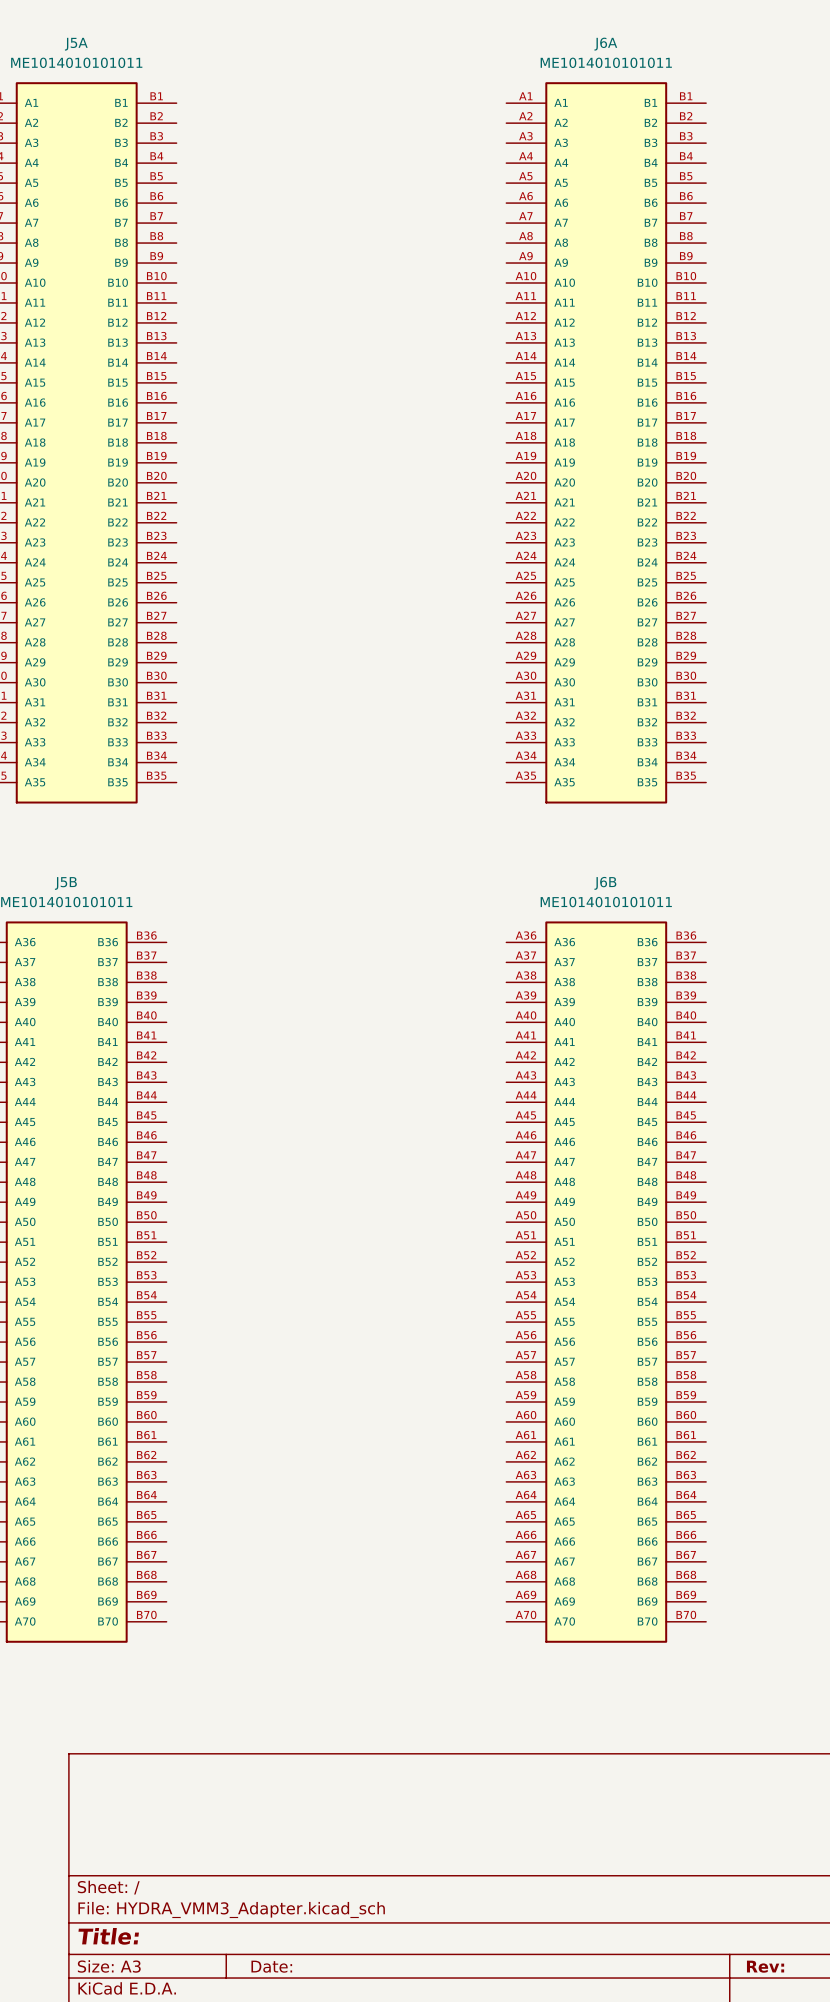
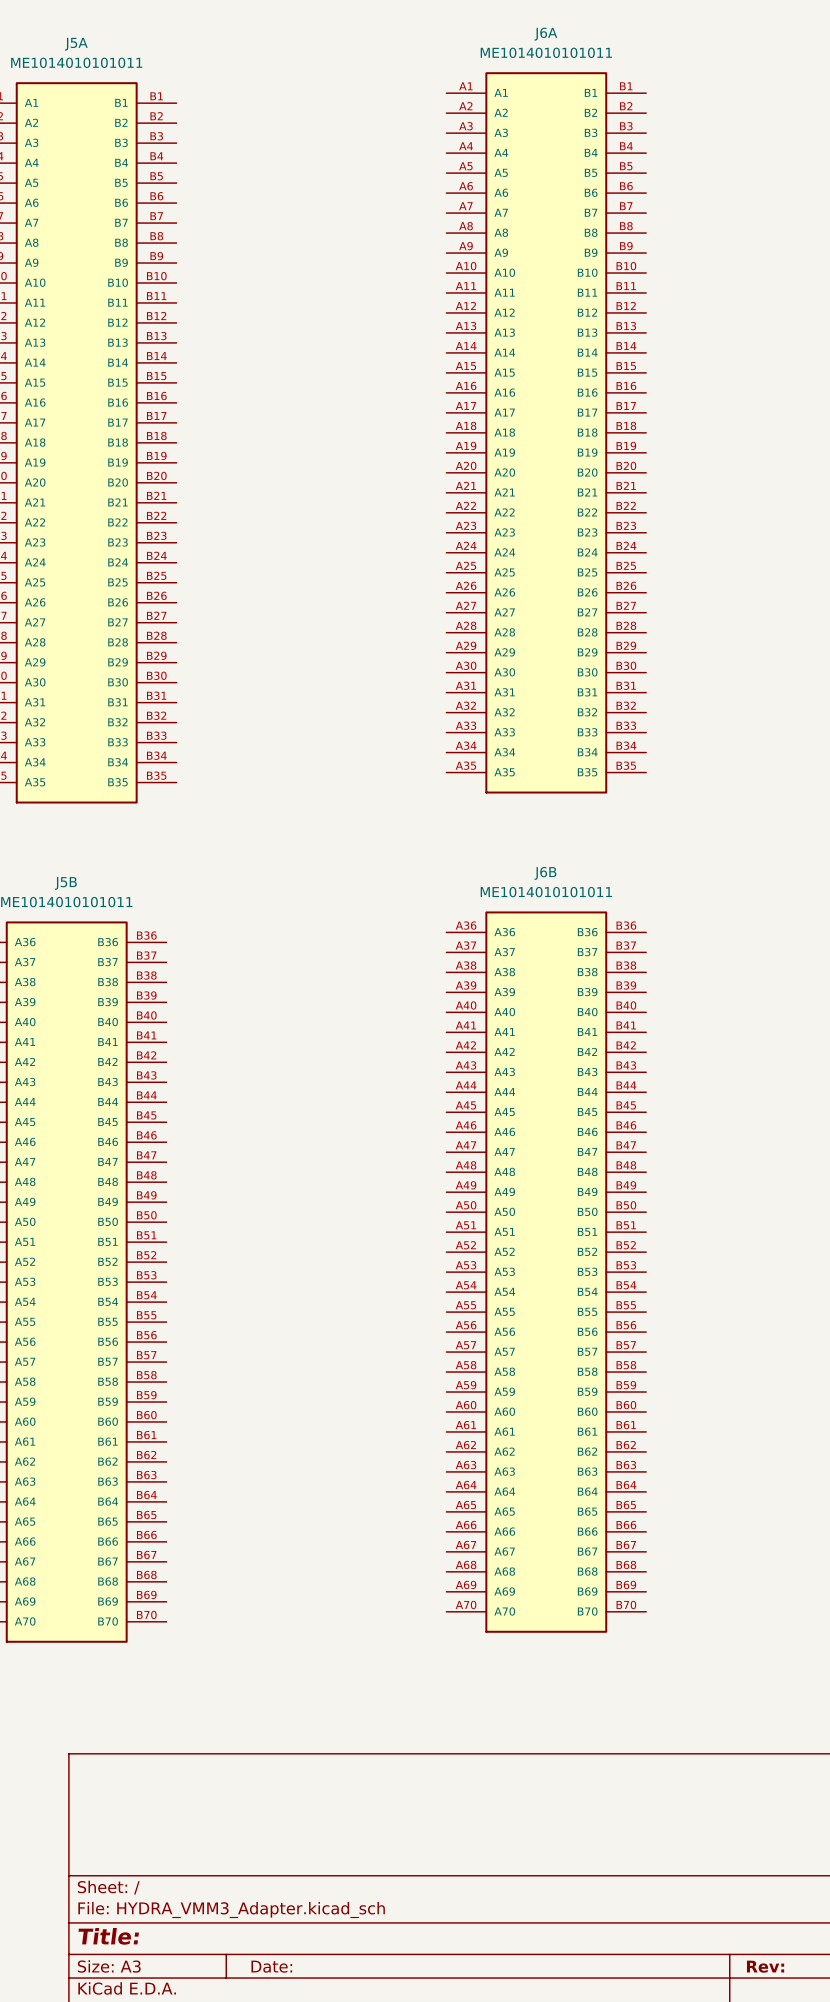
J6A position: (606, 442) -> (546, 432)
J6B position: (606, 1282) -> (546, 1272)

